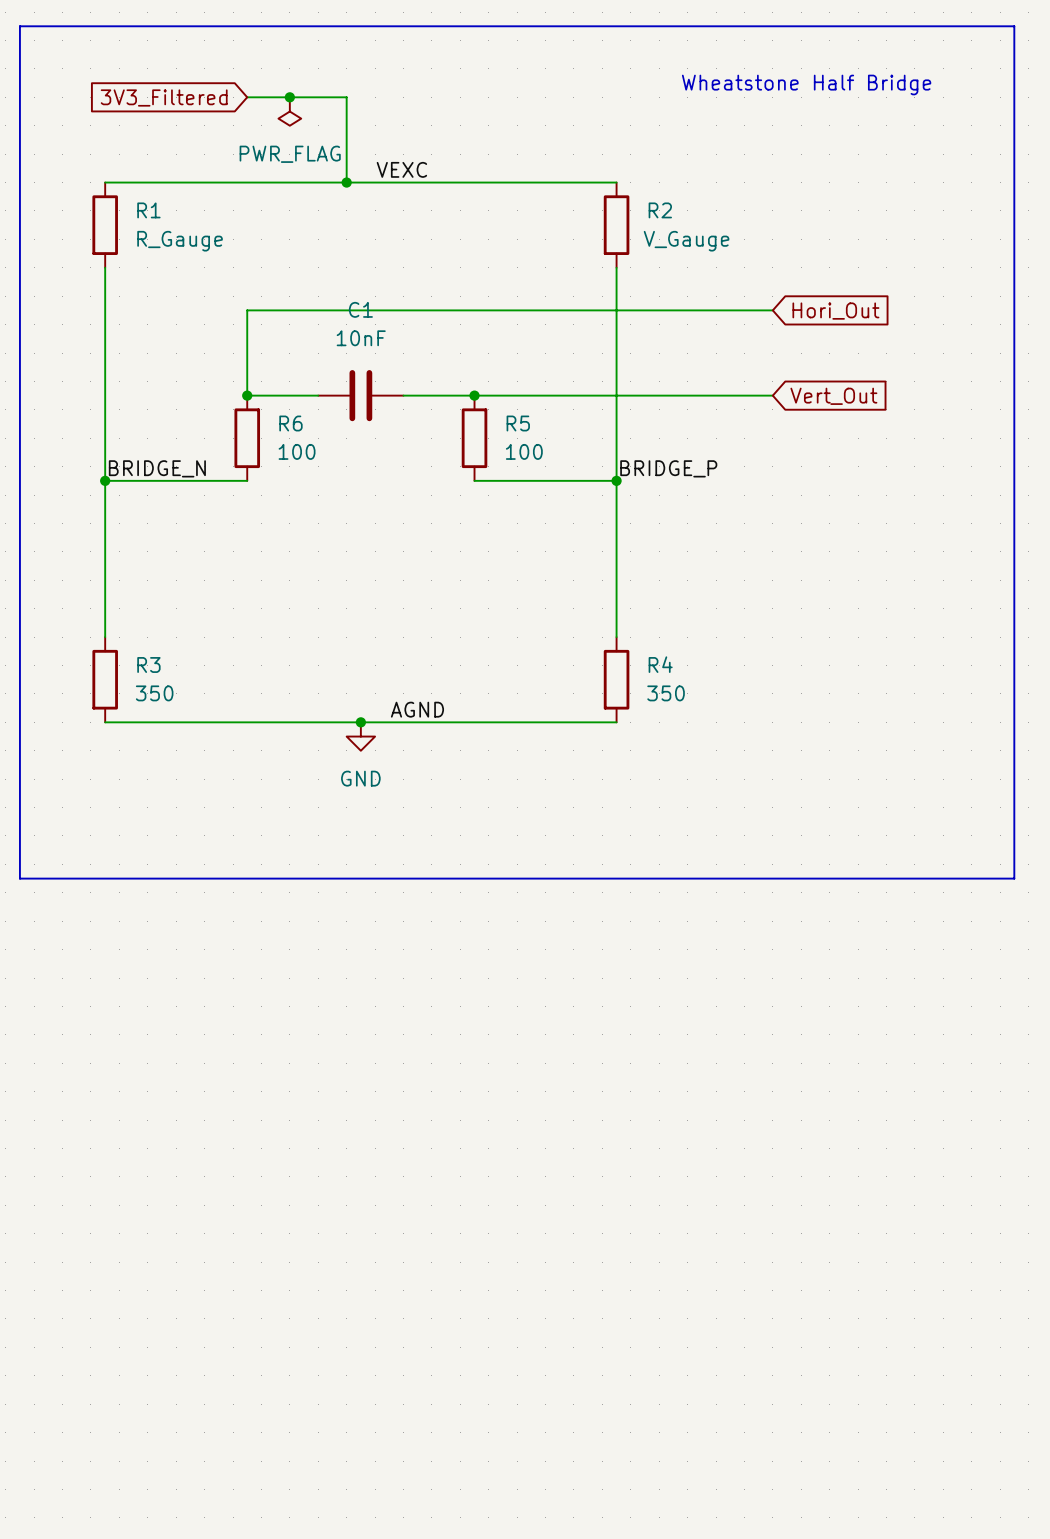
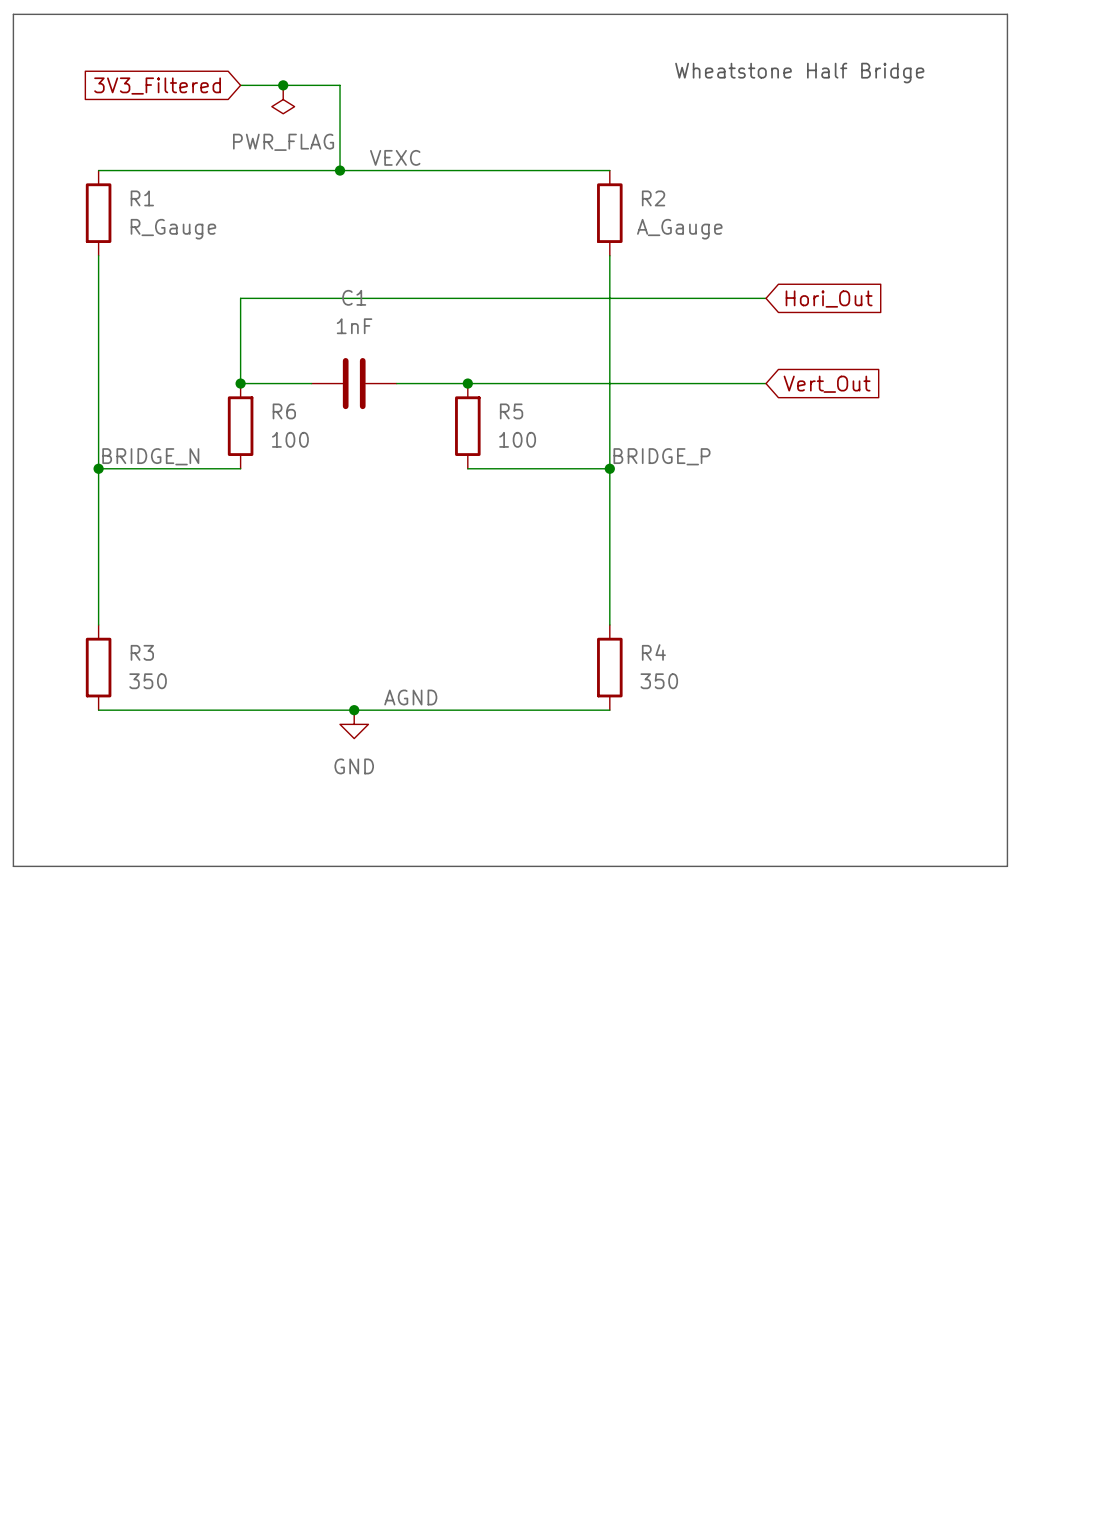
R2 value: V_Gauge (686, 241) -> A_Gauge (679, 229)
C1 value: 10nF (361, 338) -> 1nF (354, 326)

